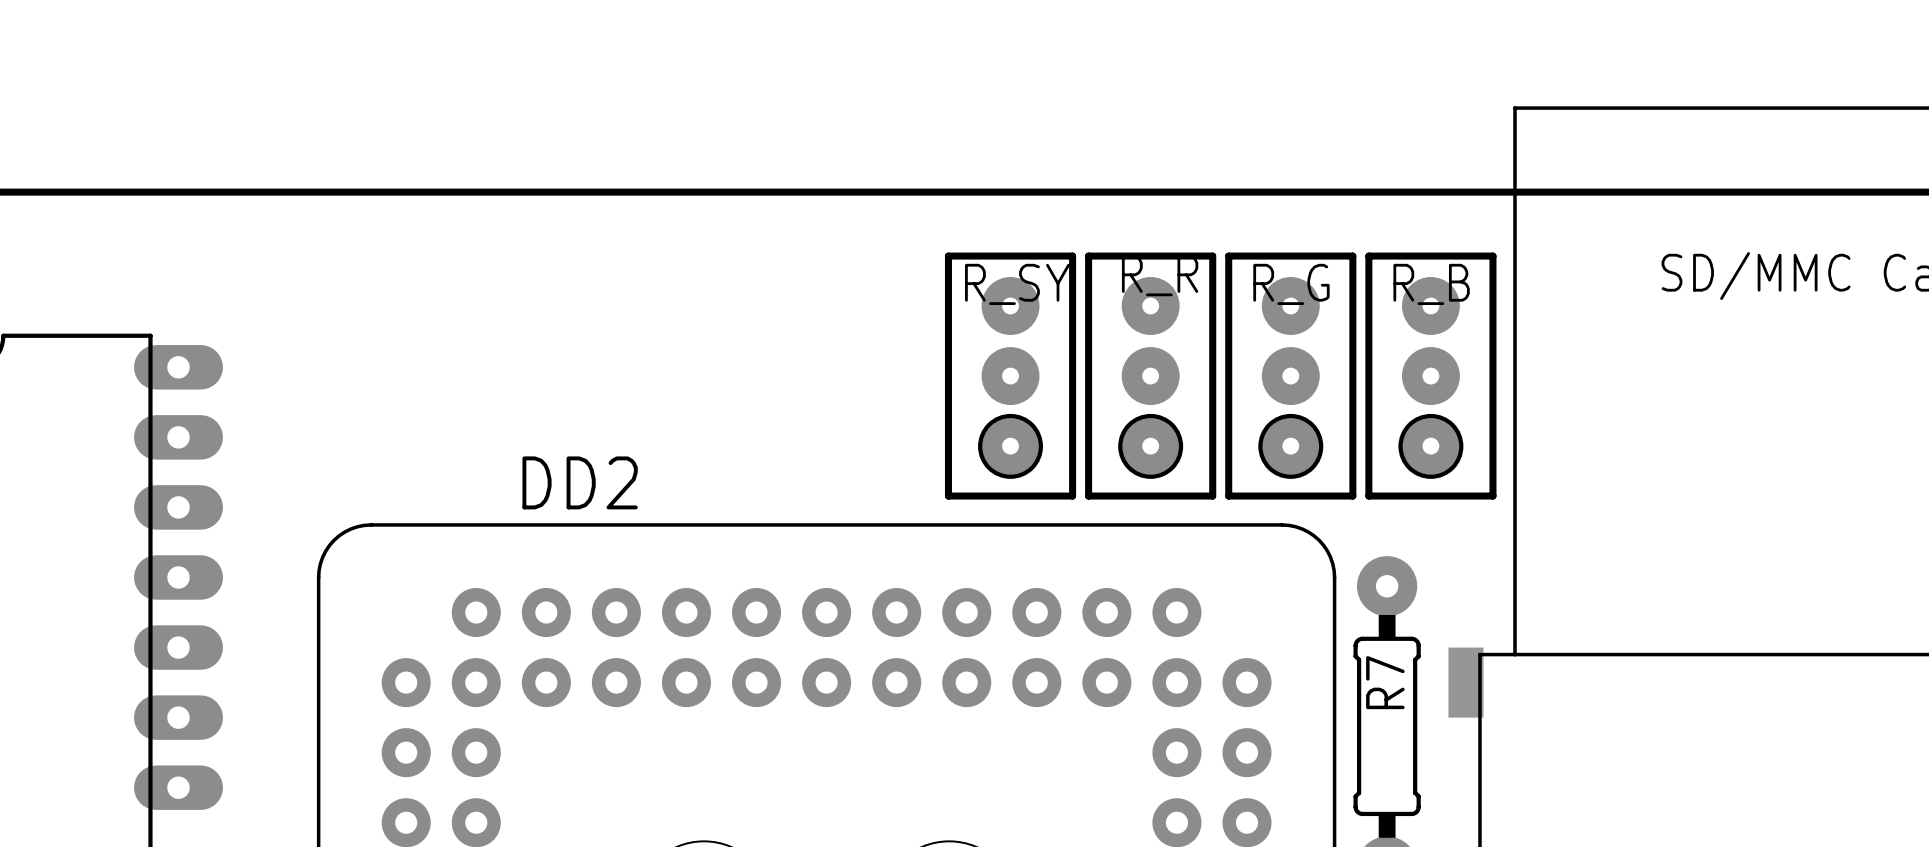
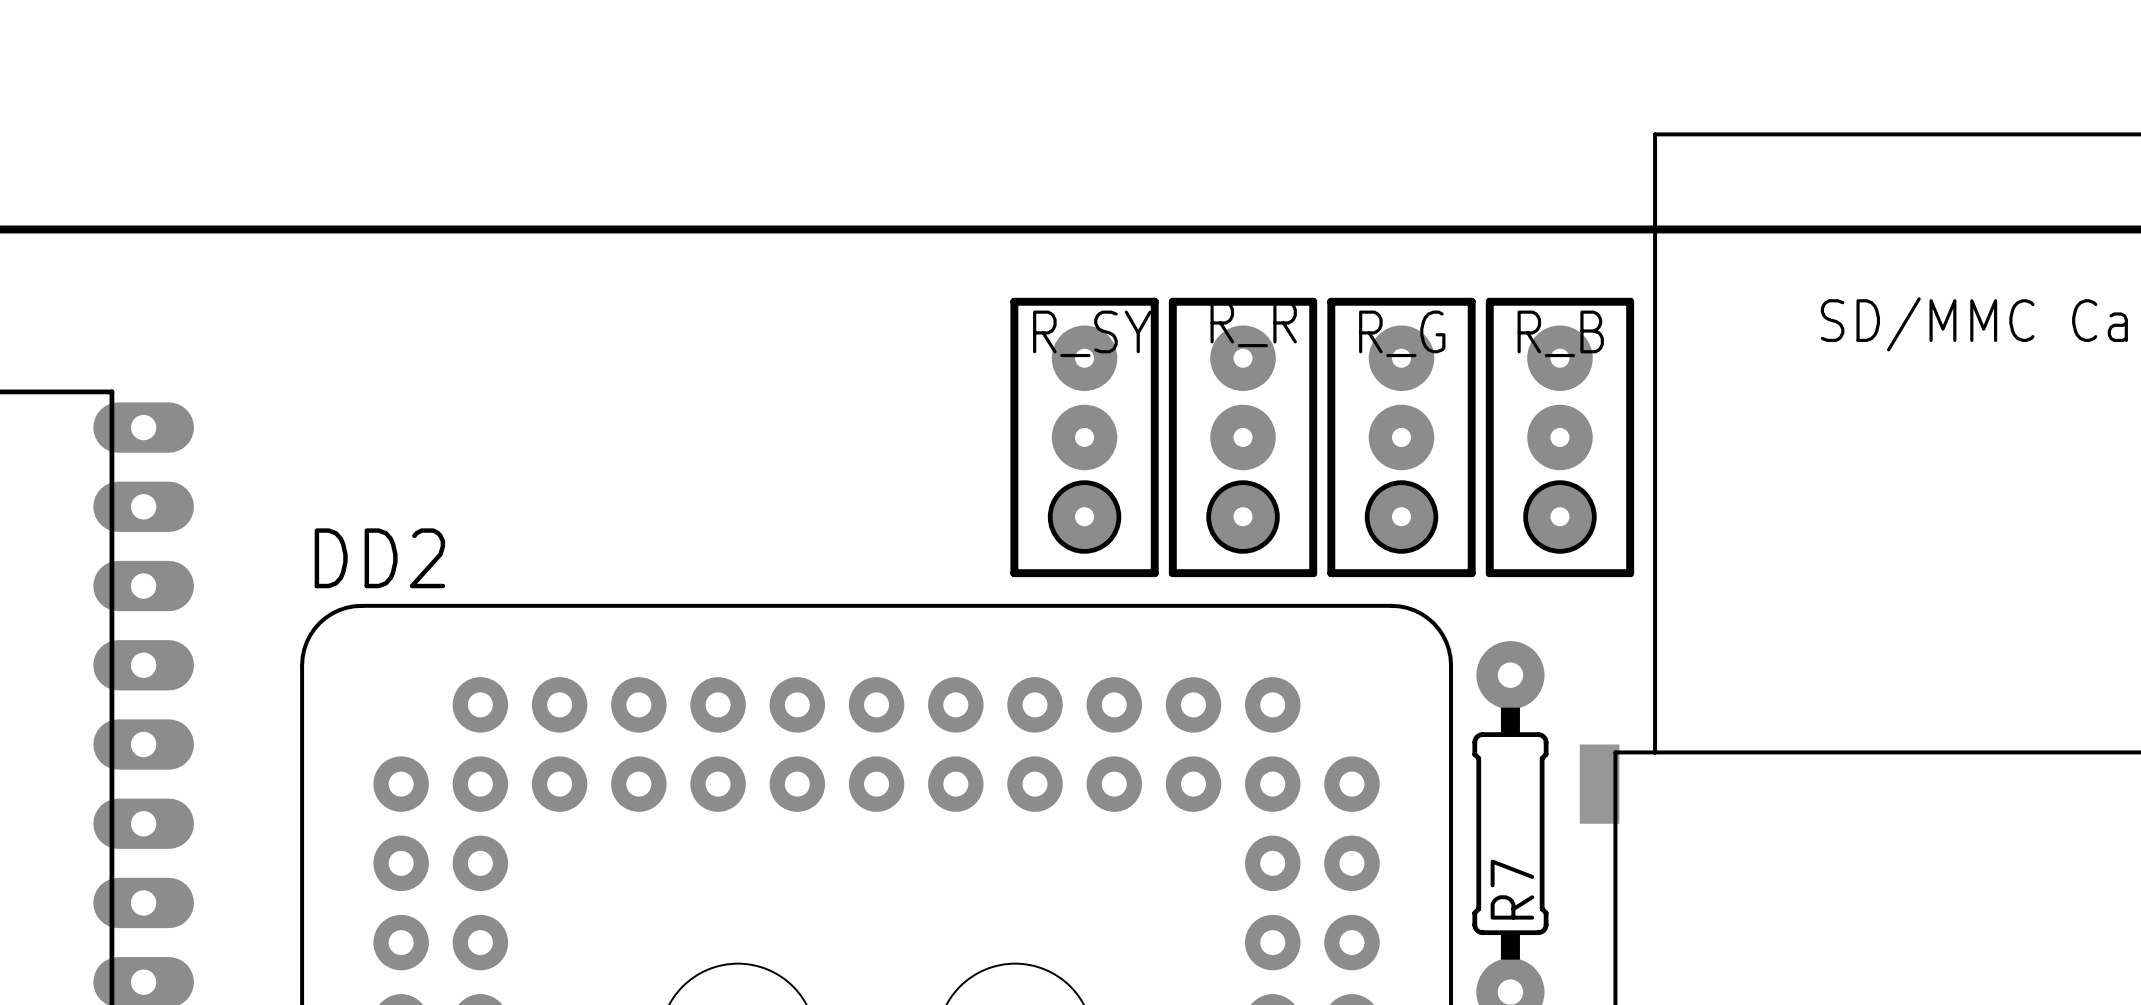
DD2 name position: DD2 (580, 482) -> DD2 (379, 558)
R7 name position: R7 (1385, 682) -> R7 (1512, 889)

